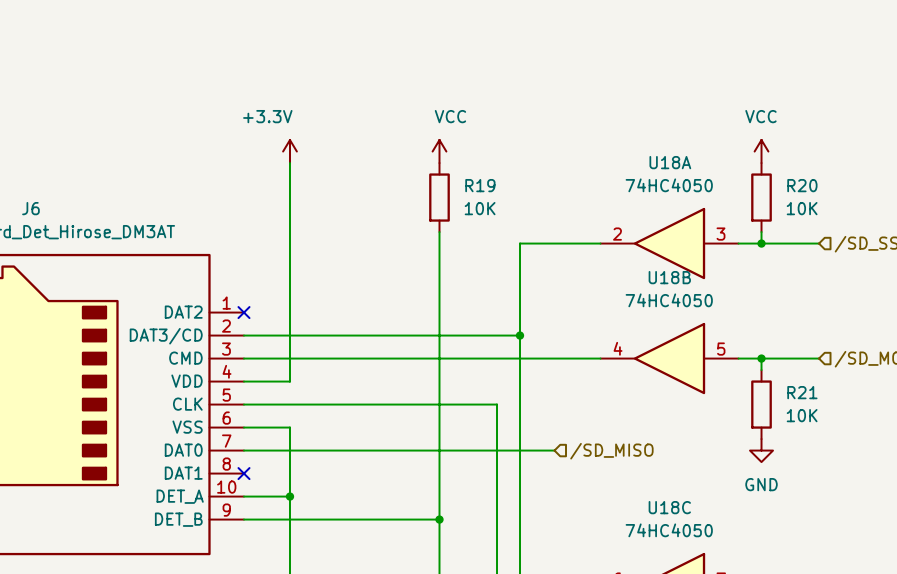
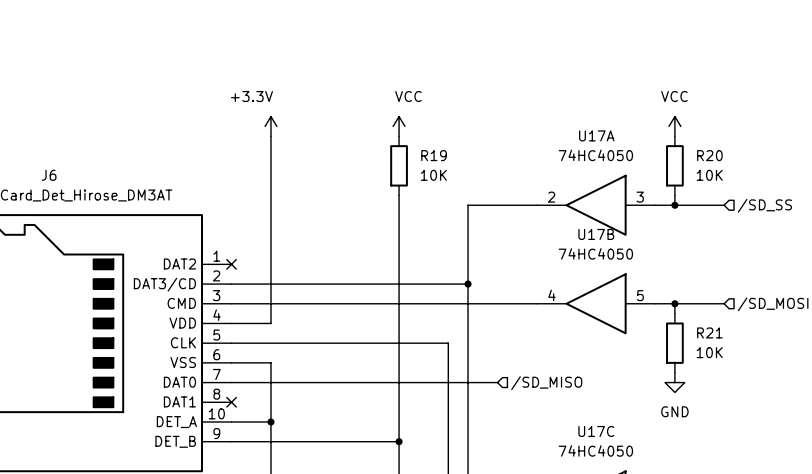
U18A name: U18A (670, 162) -> U17A (596, 135)
U18B name: U18B (669, 277) -> U17B (596, 234)
U18C name: U18C (669, 507) -> U17C (596, 431)

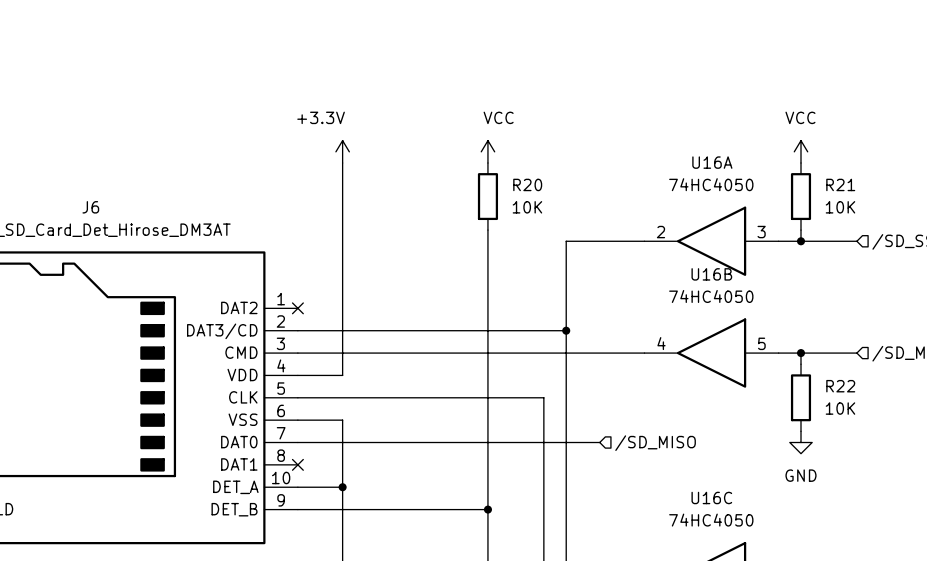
U17A name: U17A (596, 135) -> U16A (712, 162)
R19 name: R19 (434, 155) -> R20 (527, 184)
R20 name: R20 (709, 155) -> R21 (840, 184)
U17B name: U17B (596, 234) -> U16B (711, 274)
R21 name: R21 (709, 332) -> R22 (840, 386)
U17C name: U17C (596, 431) -> U16C (711, 497)

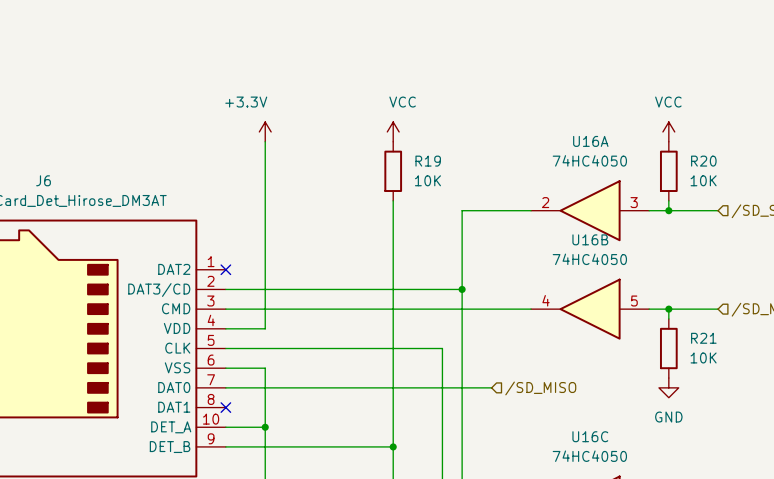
R20 name: R20 (527, 184) -> R19 (428, 161)
R21 name: R21 (840, 184) -> R20 (703, 161)
R22 name: R22 (840, 386) -> R21 (703, 338)

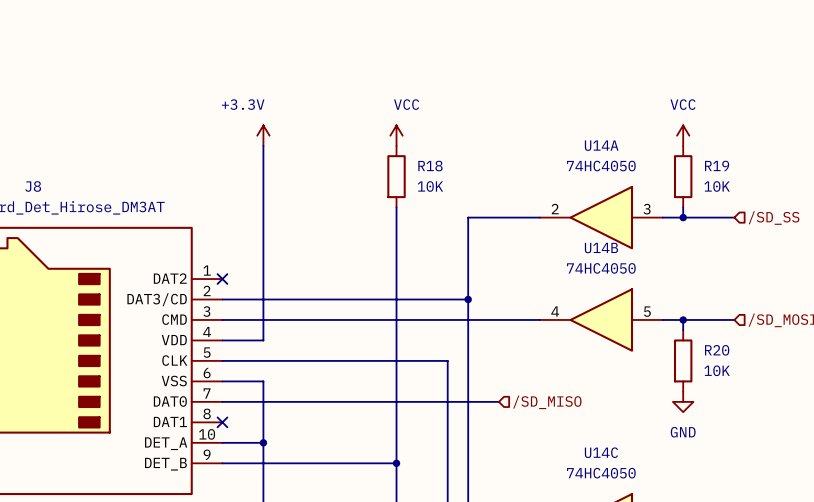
U16A name: U16A (590, 141) -> U14A (601, 145)
R19 name: R19 (428, 161) -> R18 (430, 166)
R20 name: R20 (703, 161) -> R19 (717, 165)
J6 name: J6 (43, 180) -> J8 (33, 186)
U16B name: U16B (590, 239) -> U14B (601, 248)
R21 name: R21 (703, 338) -> R20 (717, 350)
U16C name: U16C (590, 436) -> U14C (601, 452)

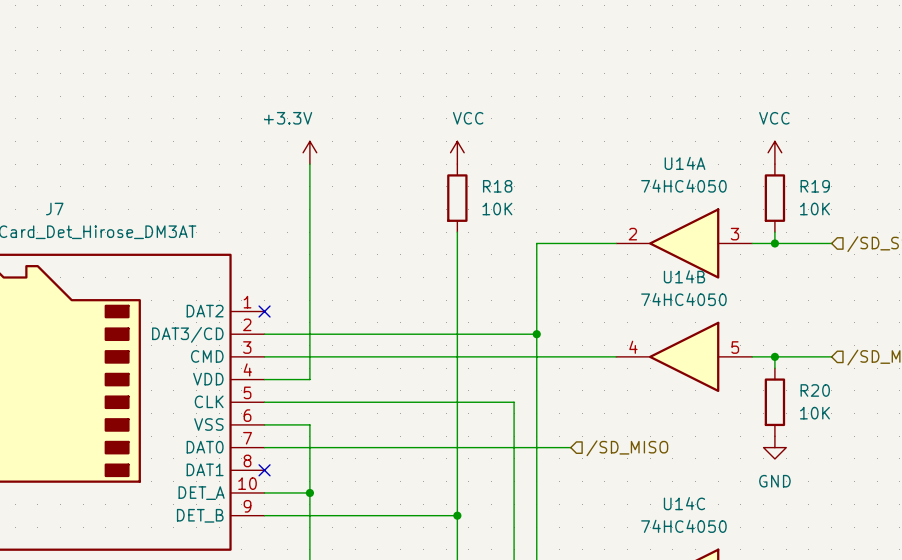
J8 name: J8 (33, 186) -> J7 (54, 209)

